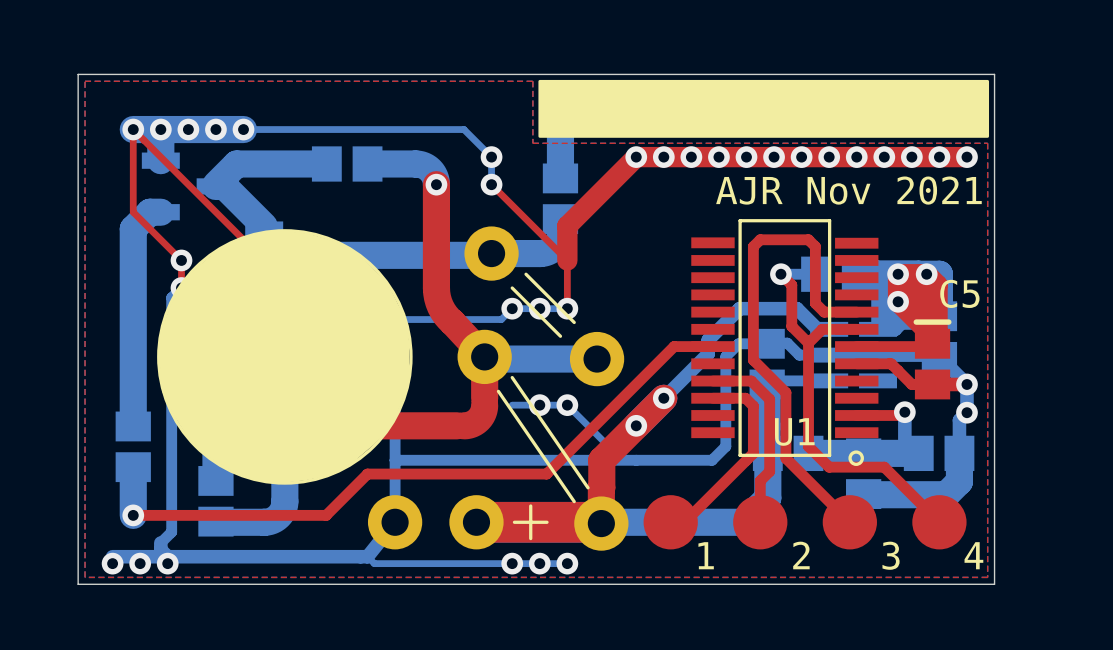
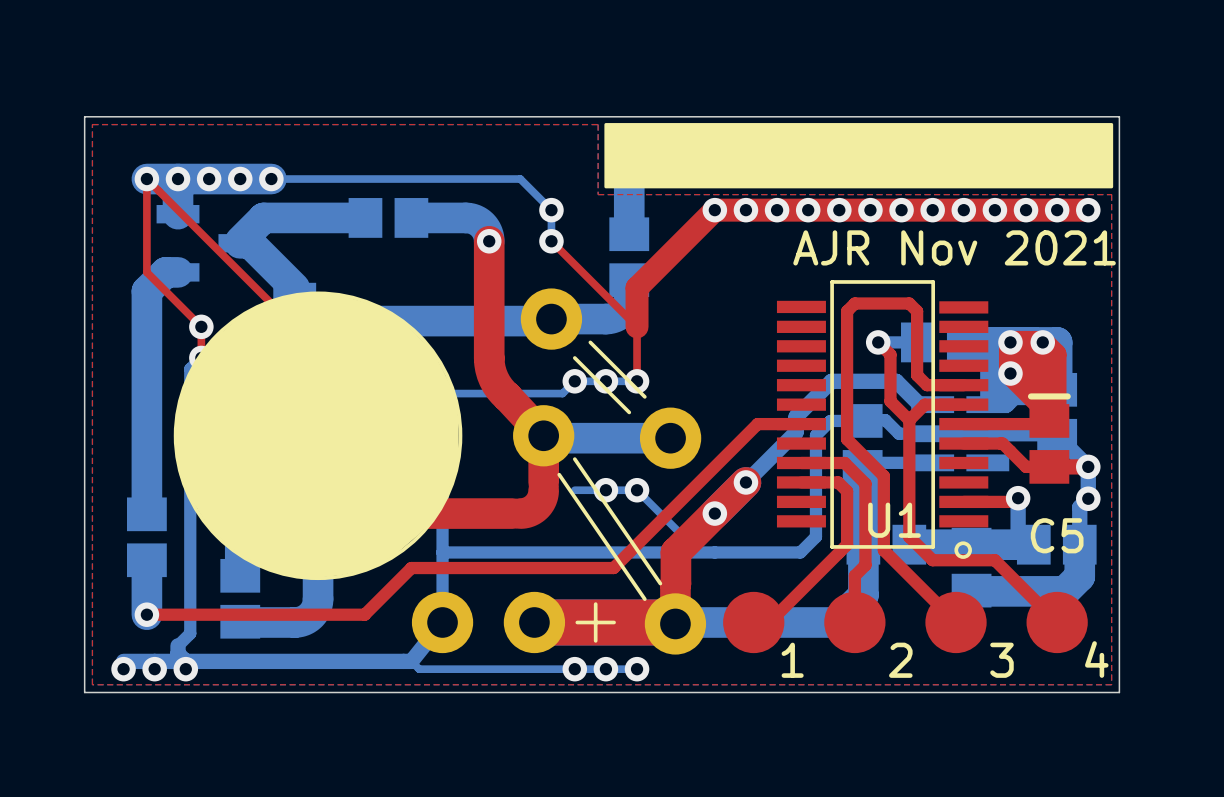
C5 name position: C5 (959, 293) -> C5 (1057, 535)

